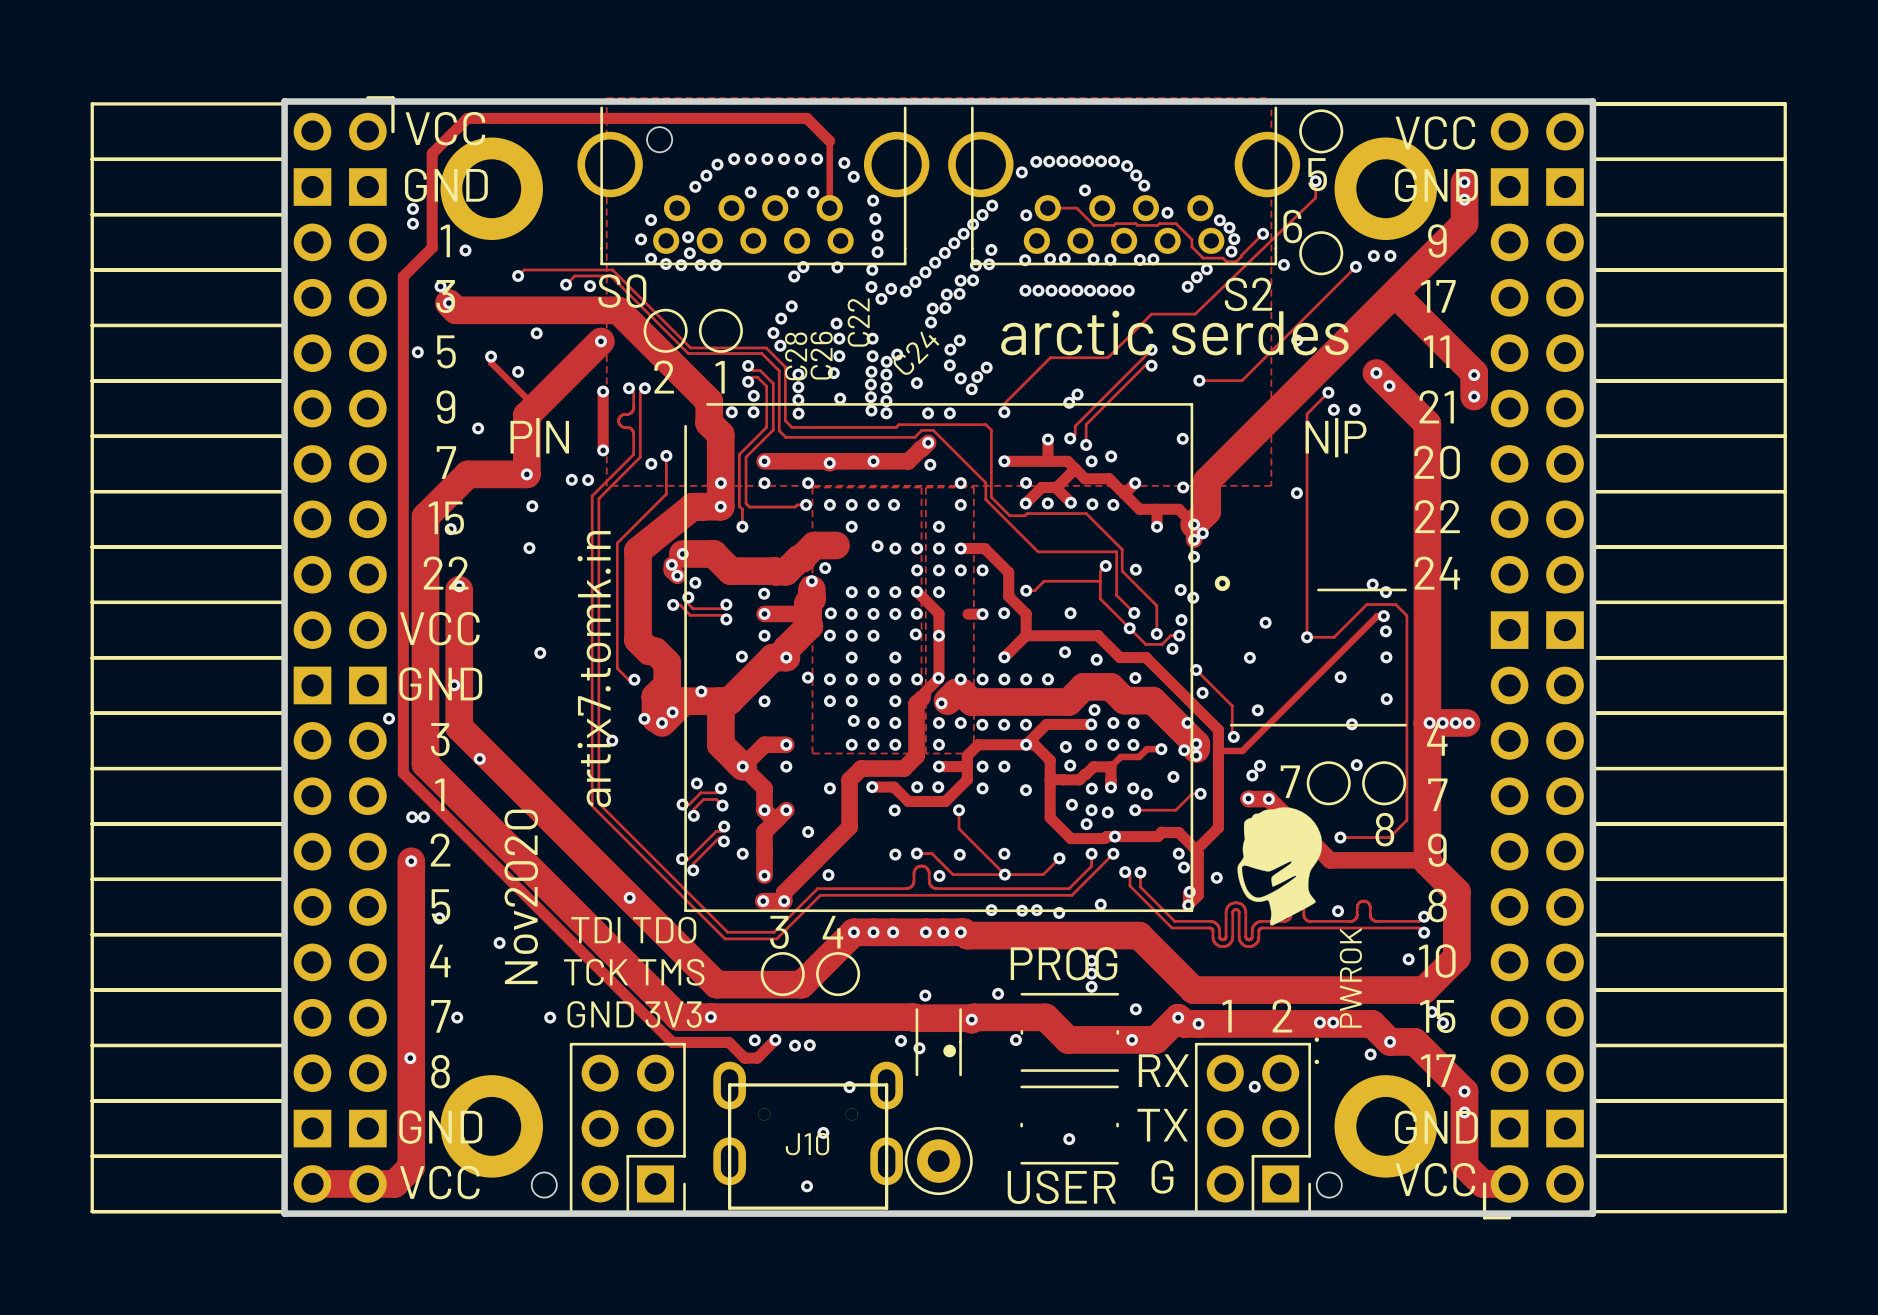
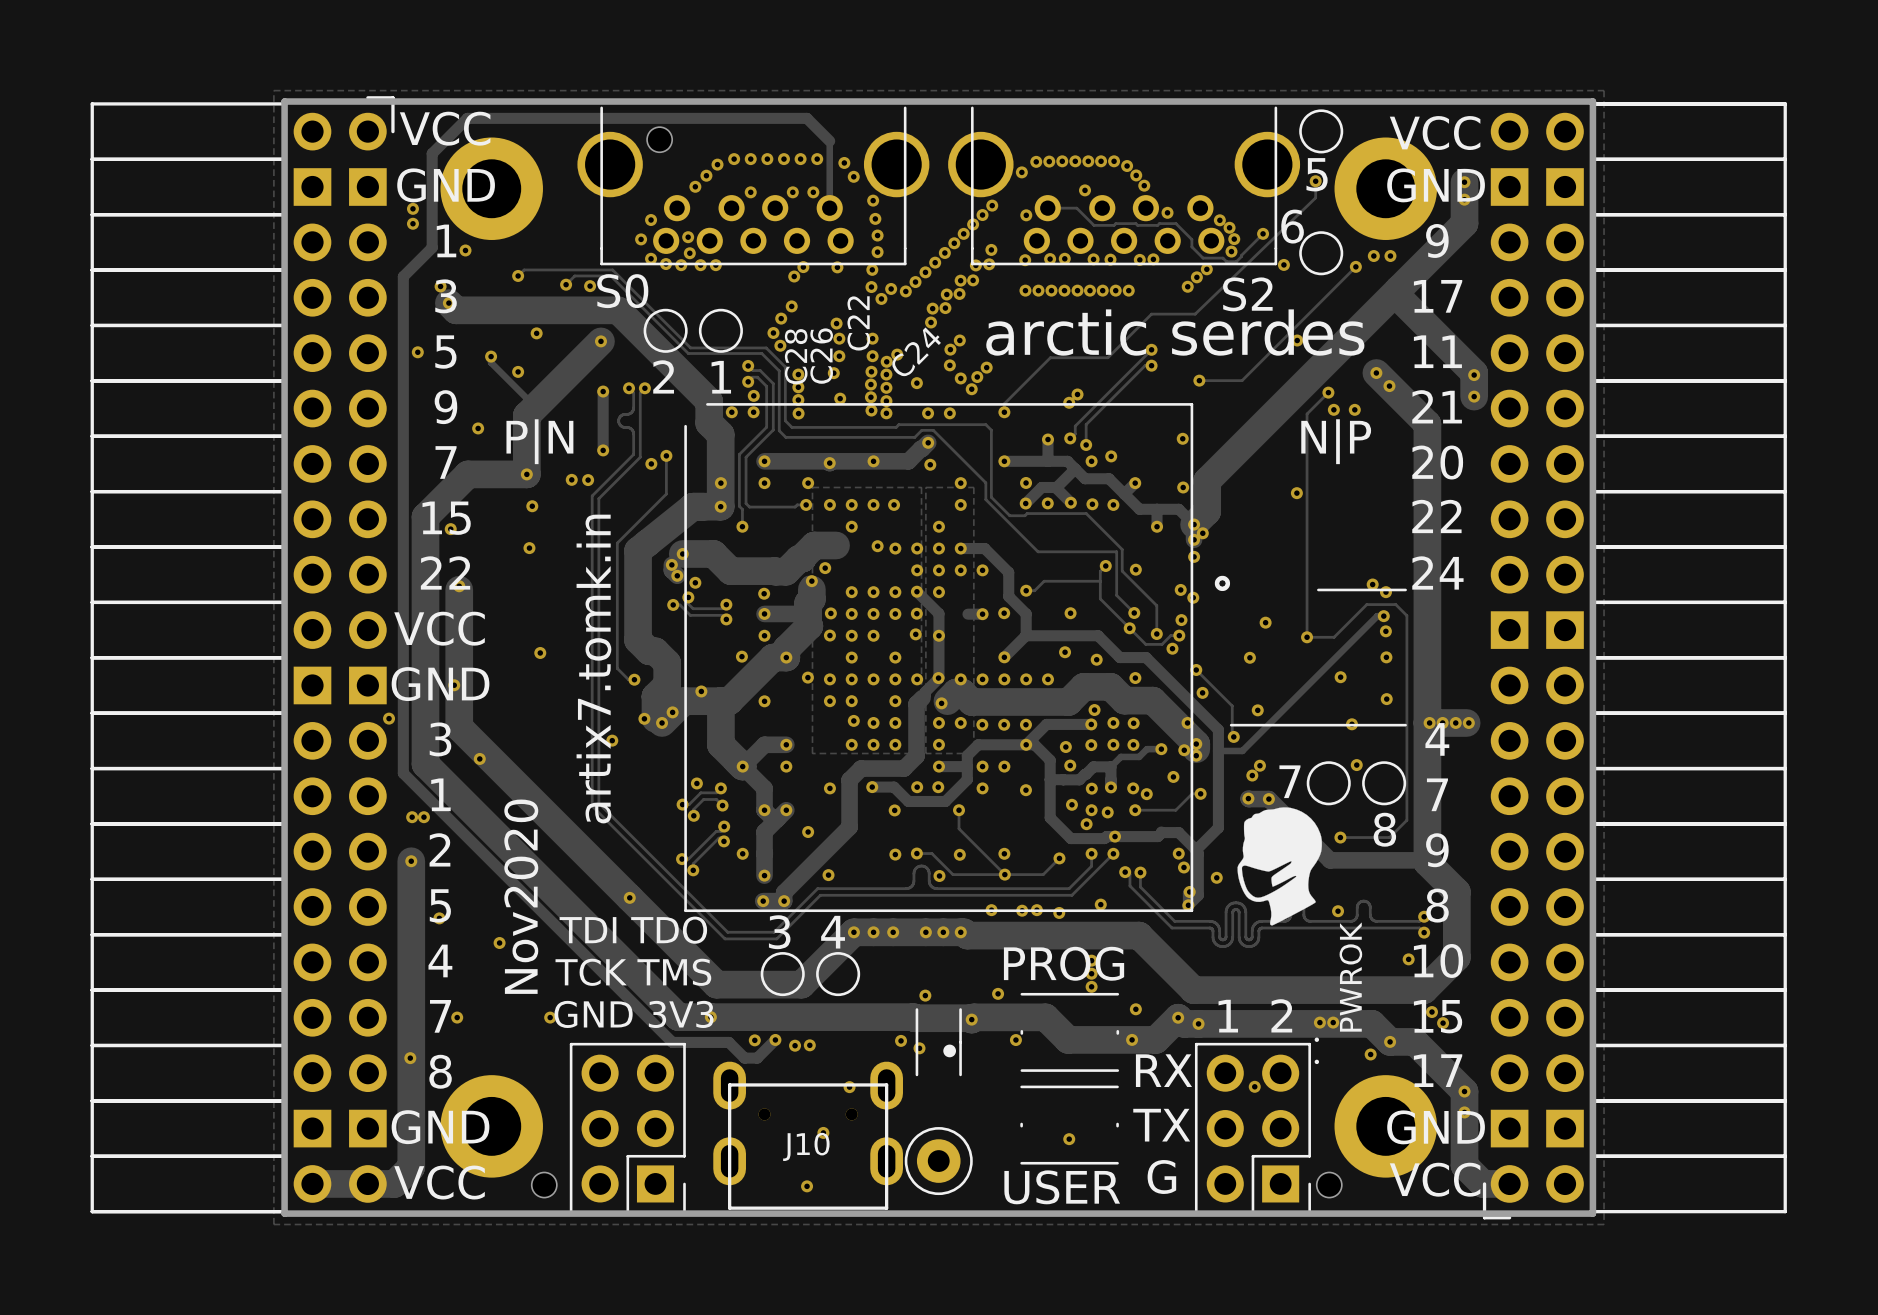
zone outline: none -> (273, 90) (273, 1224) (1604, 1224) (1604, 90) (273, 90)
zone outline: (606, 98) (606, 485) (1271, 485) (1271, 98) (606, 98) -> none

